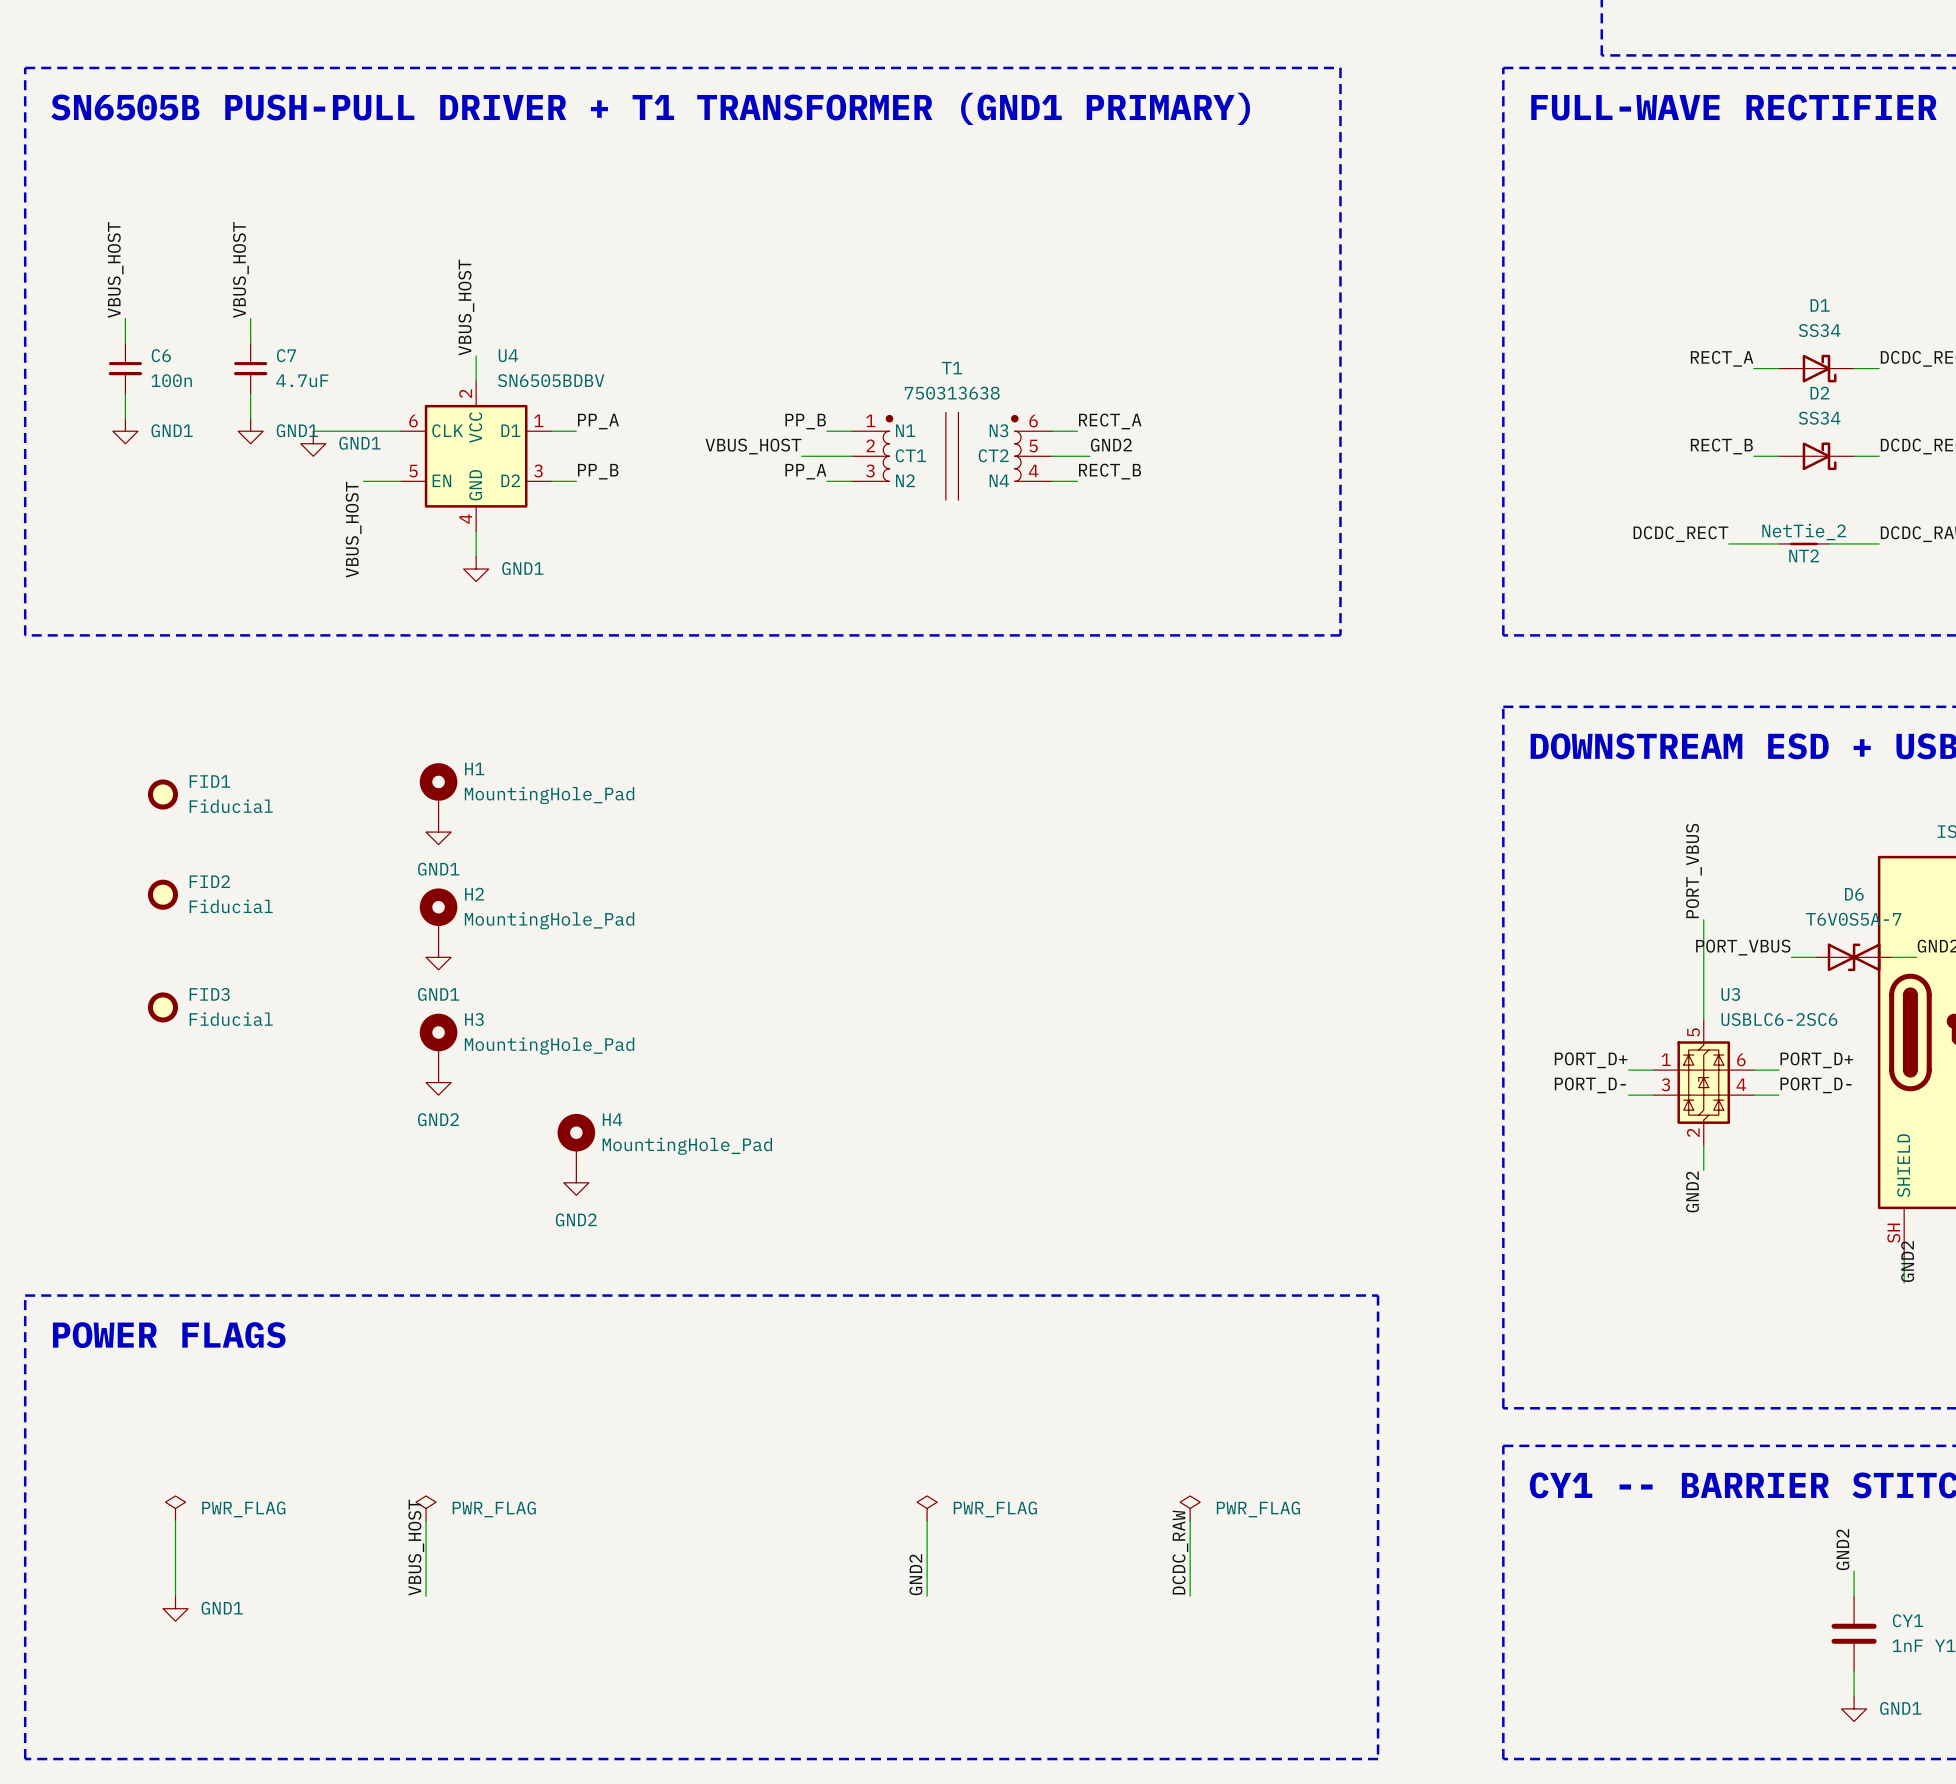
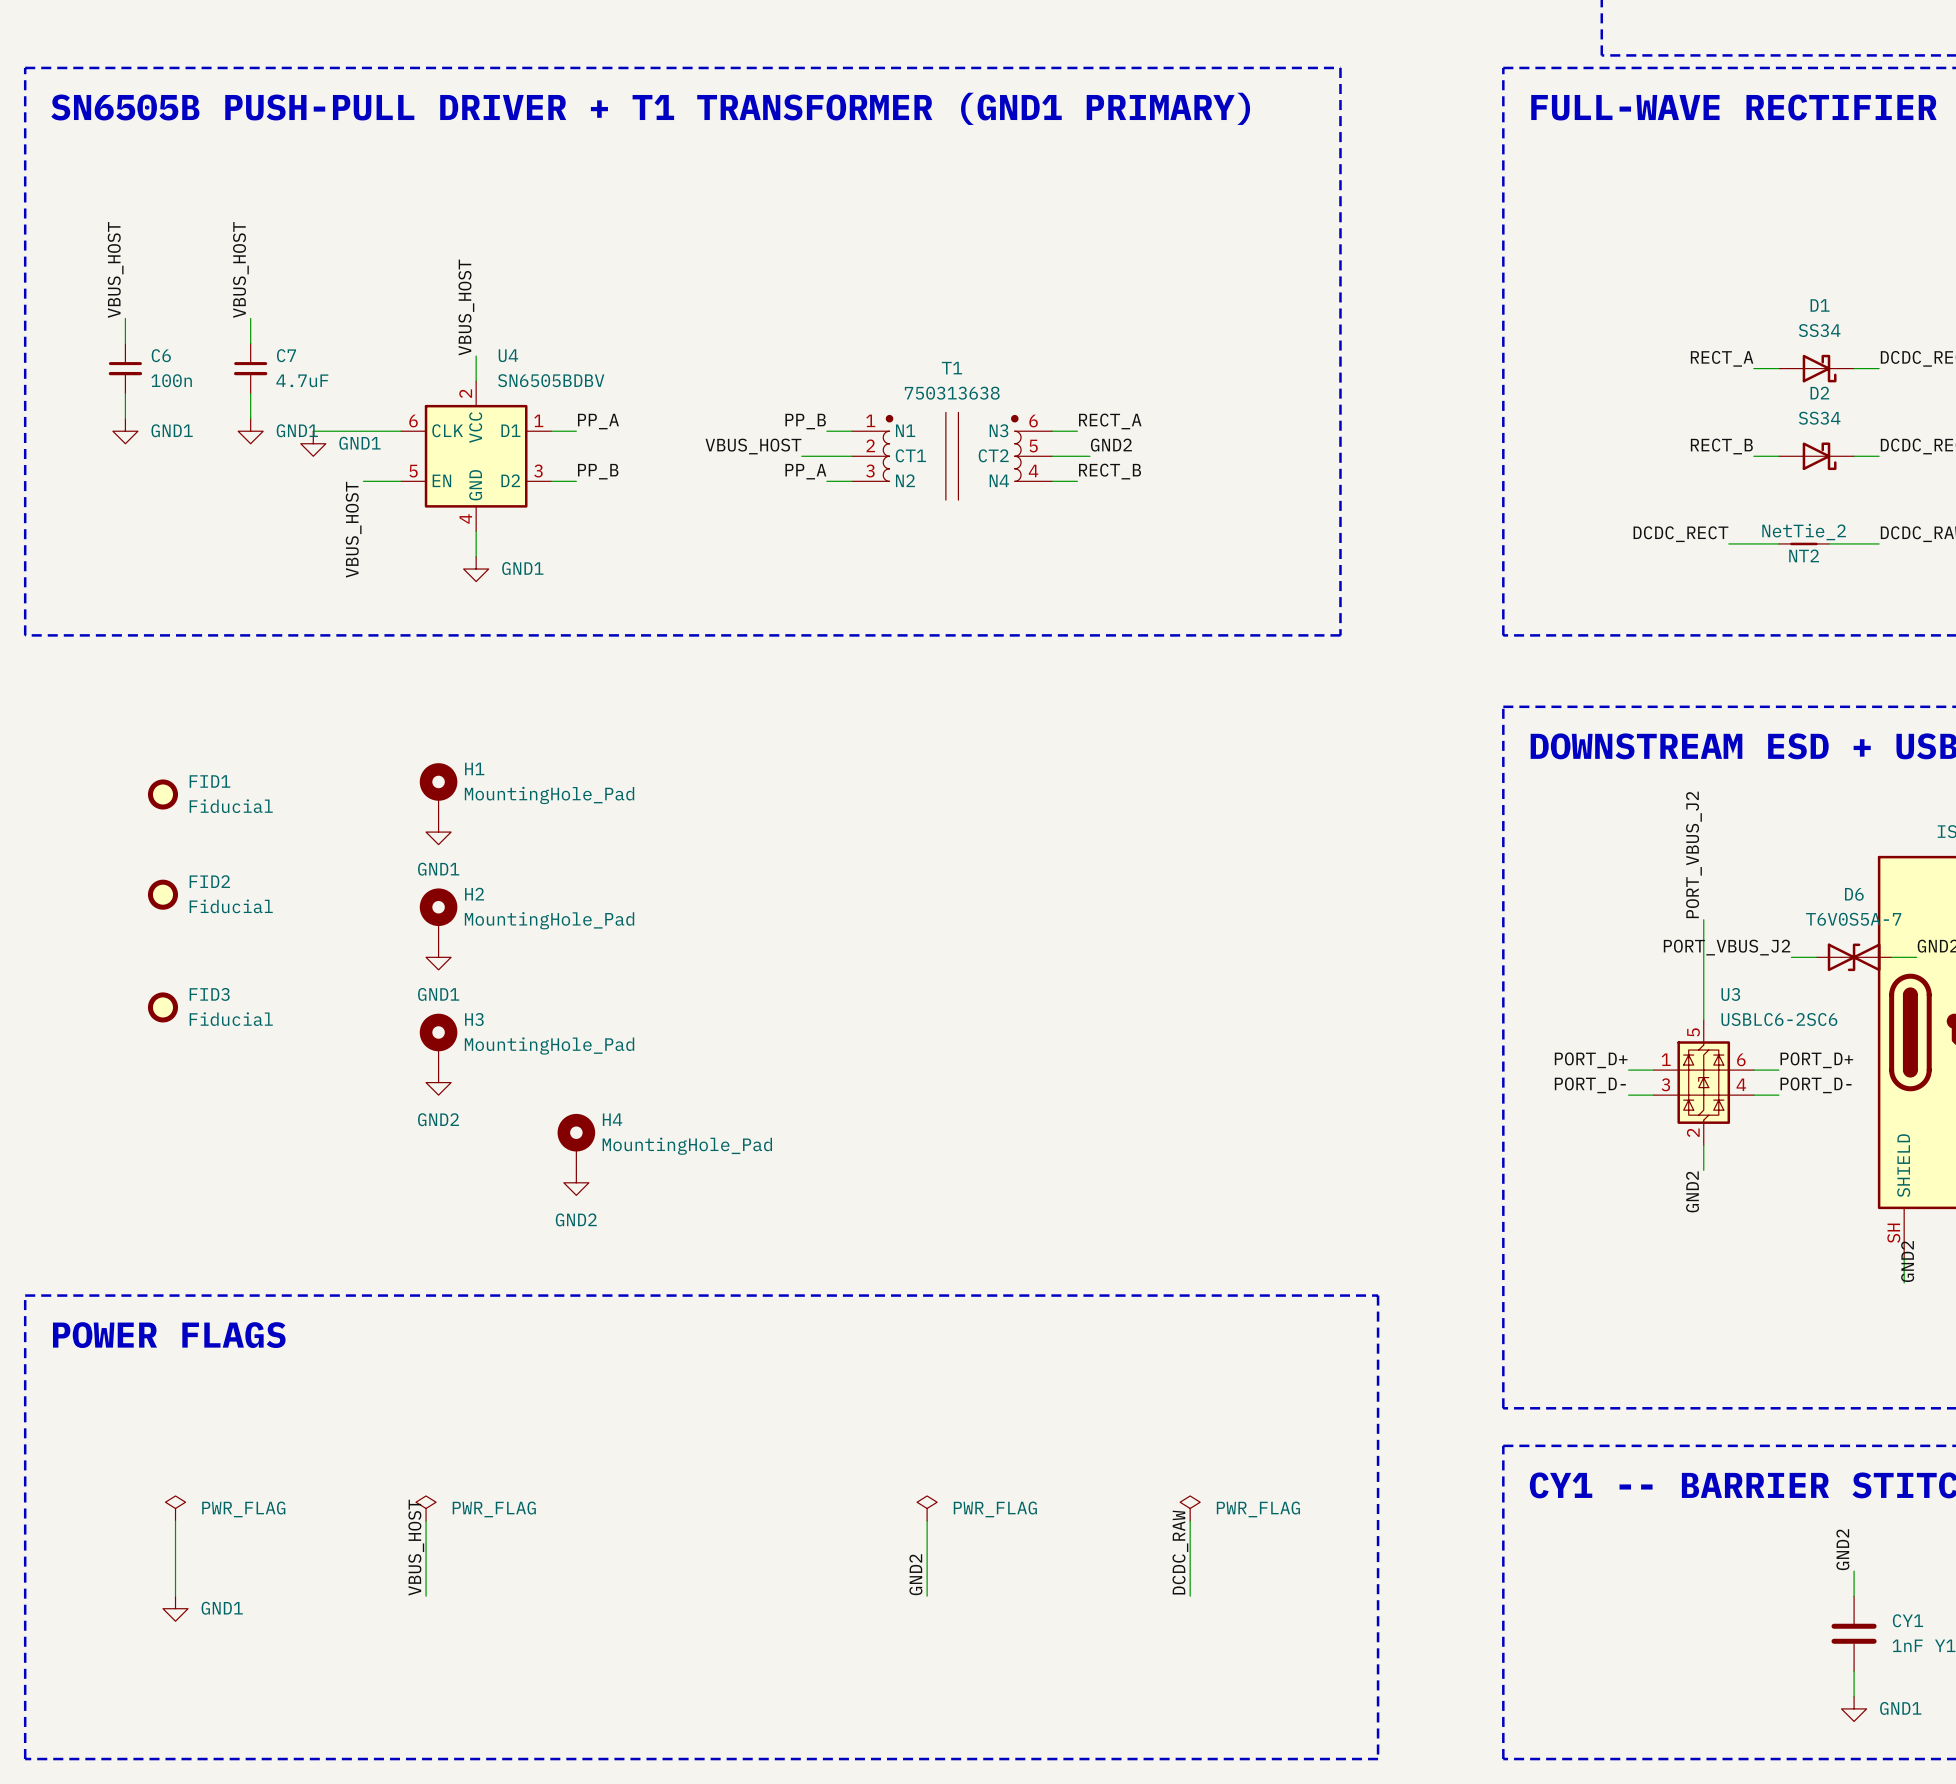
label: PORT_VBUS (1693, 871) -> PORT_VBUS_J2 (1693, 854)
label: PORT_VBUS (1743, 947) -> PORT_VBUS_J2 (1727, 947)

